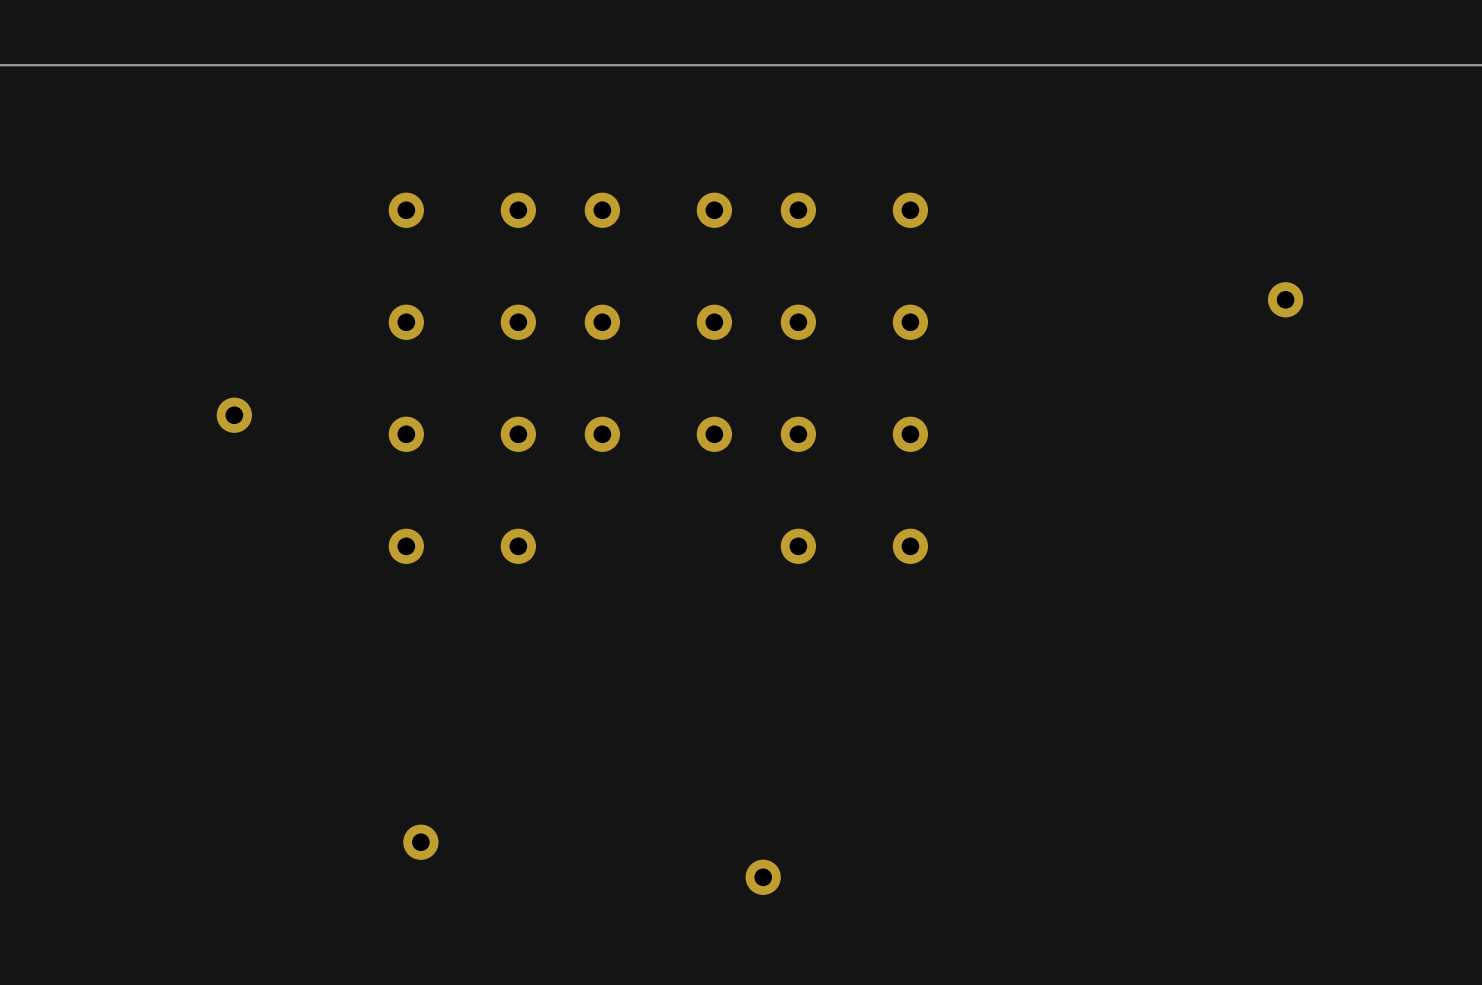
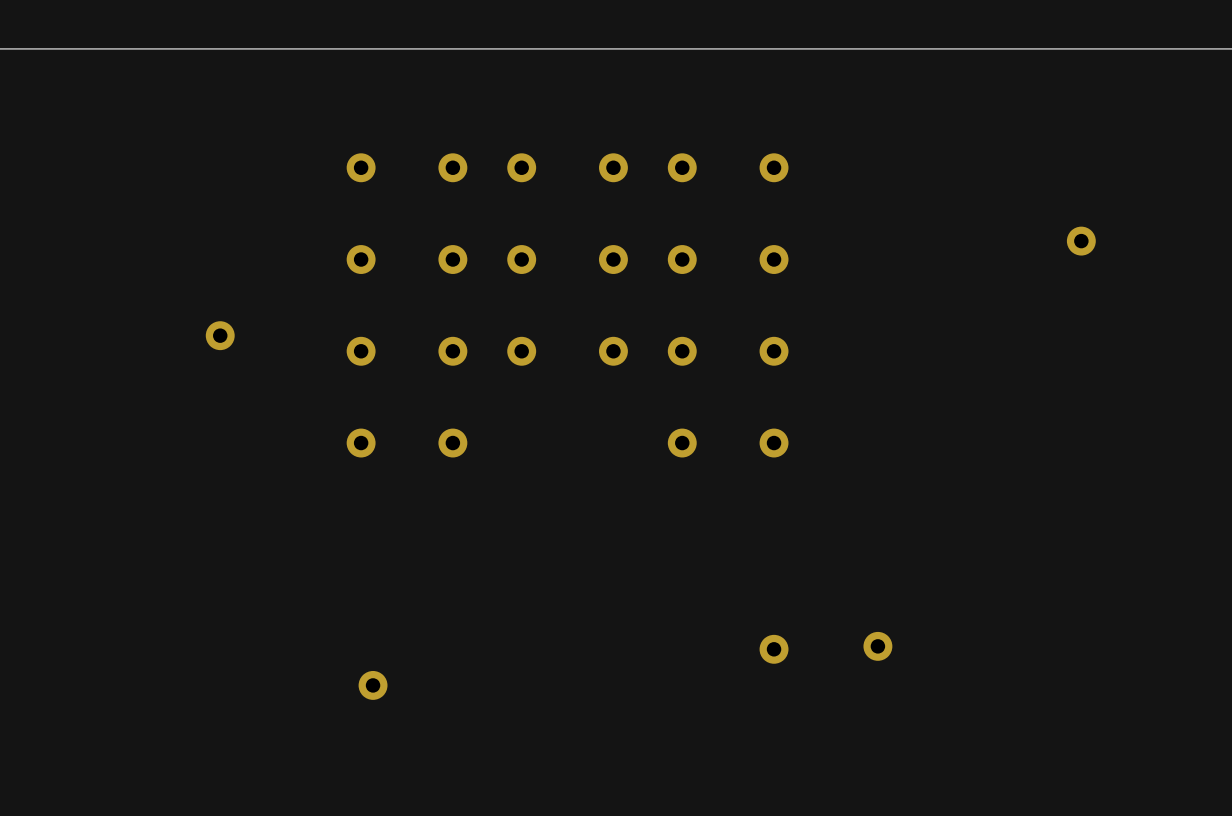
via: none -> (877, 646)
via: none -> (774, 649)
via: (763, 877) -> none

